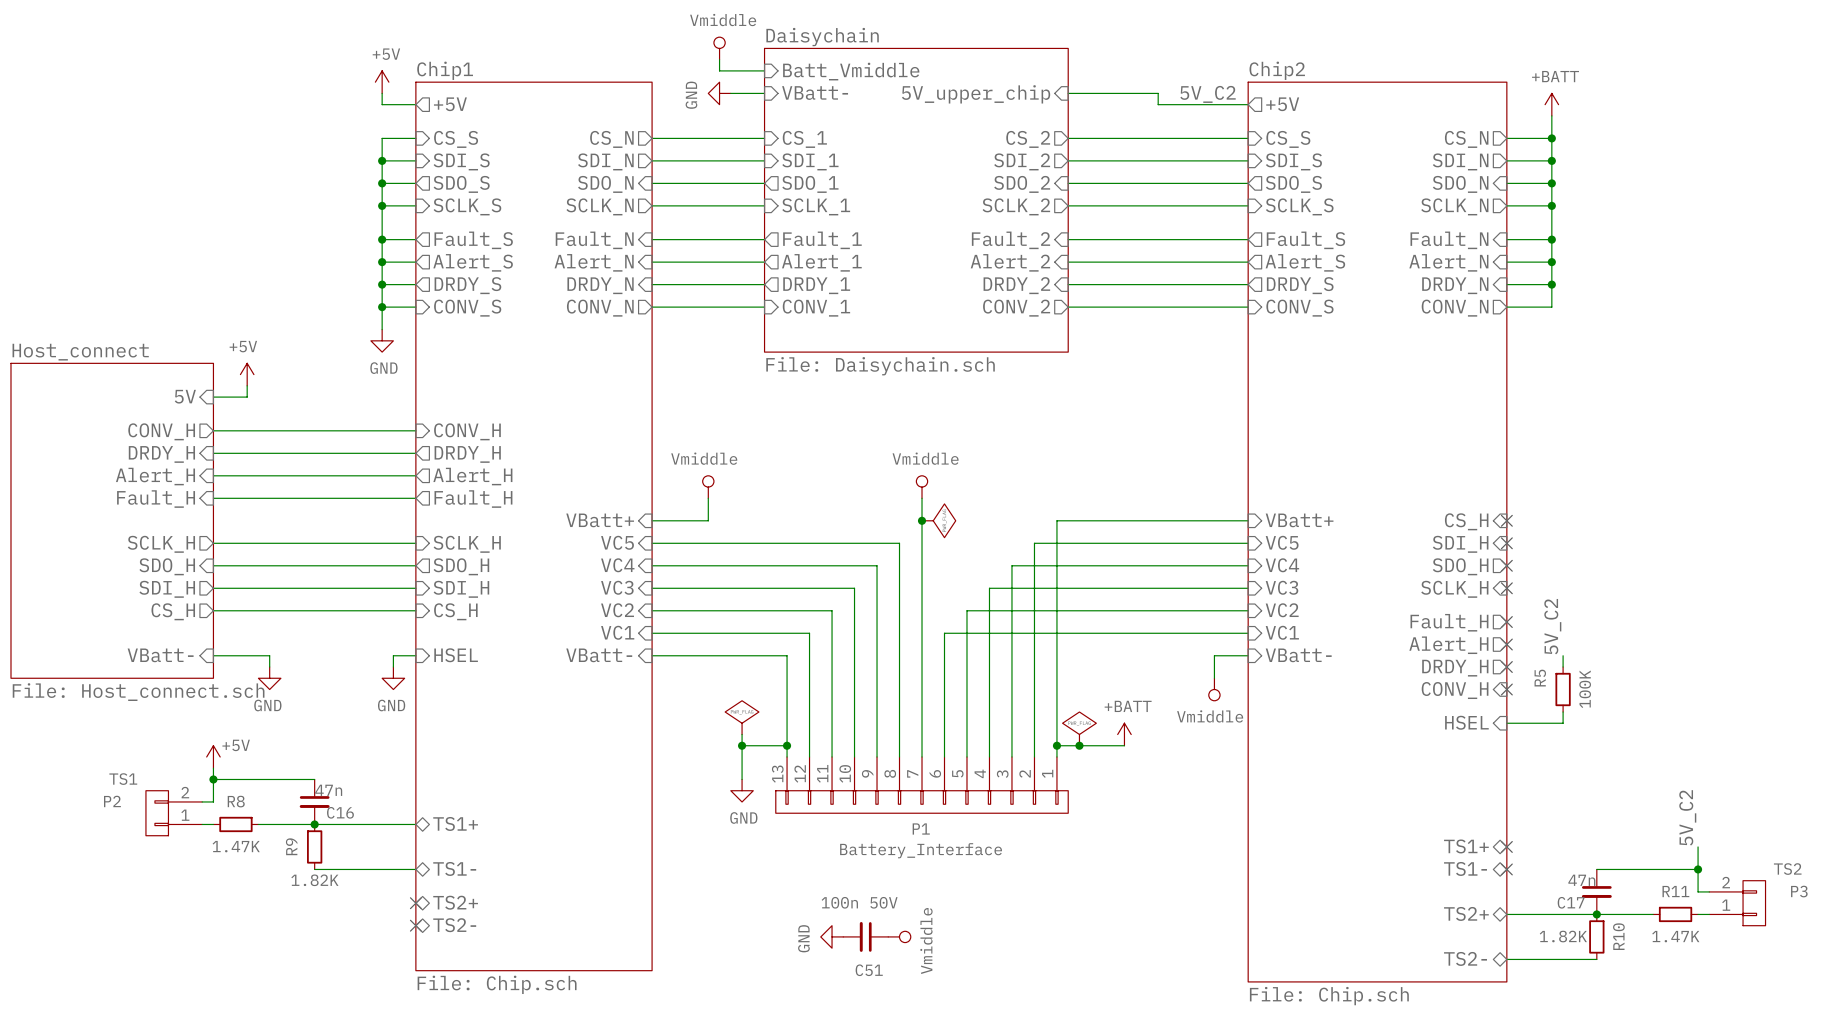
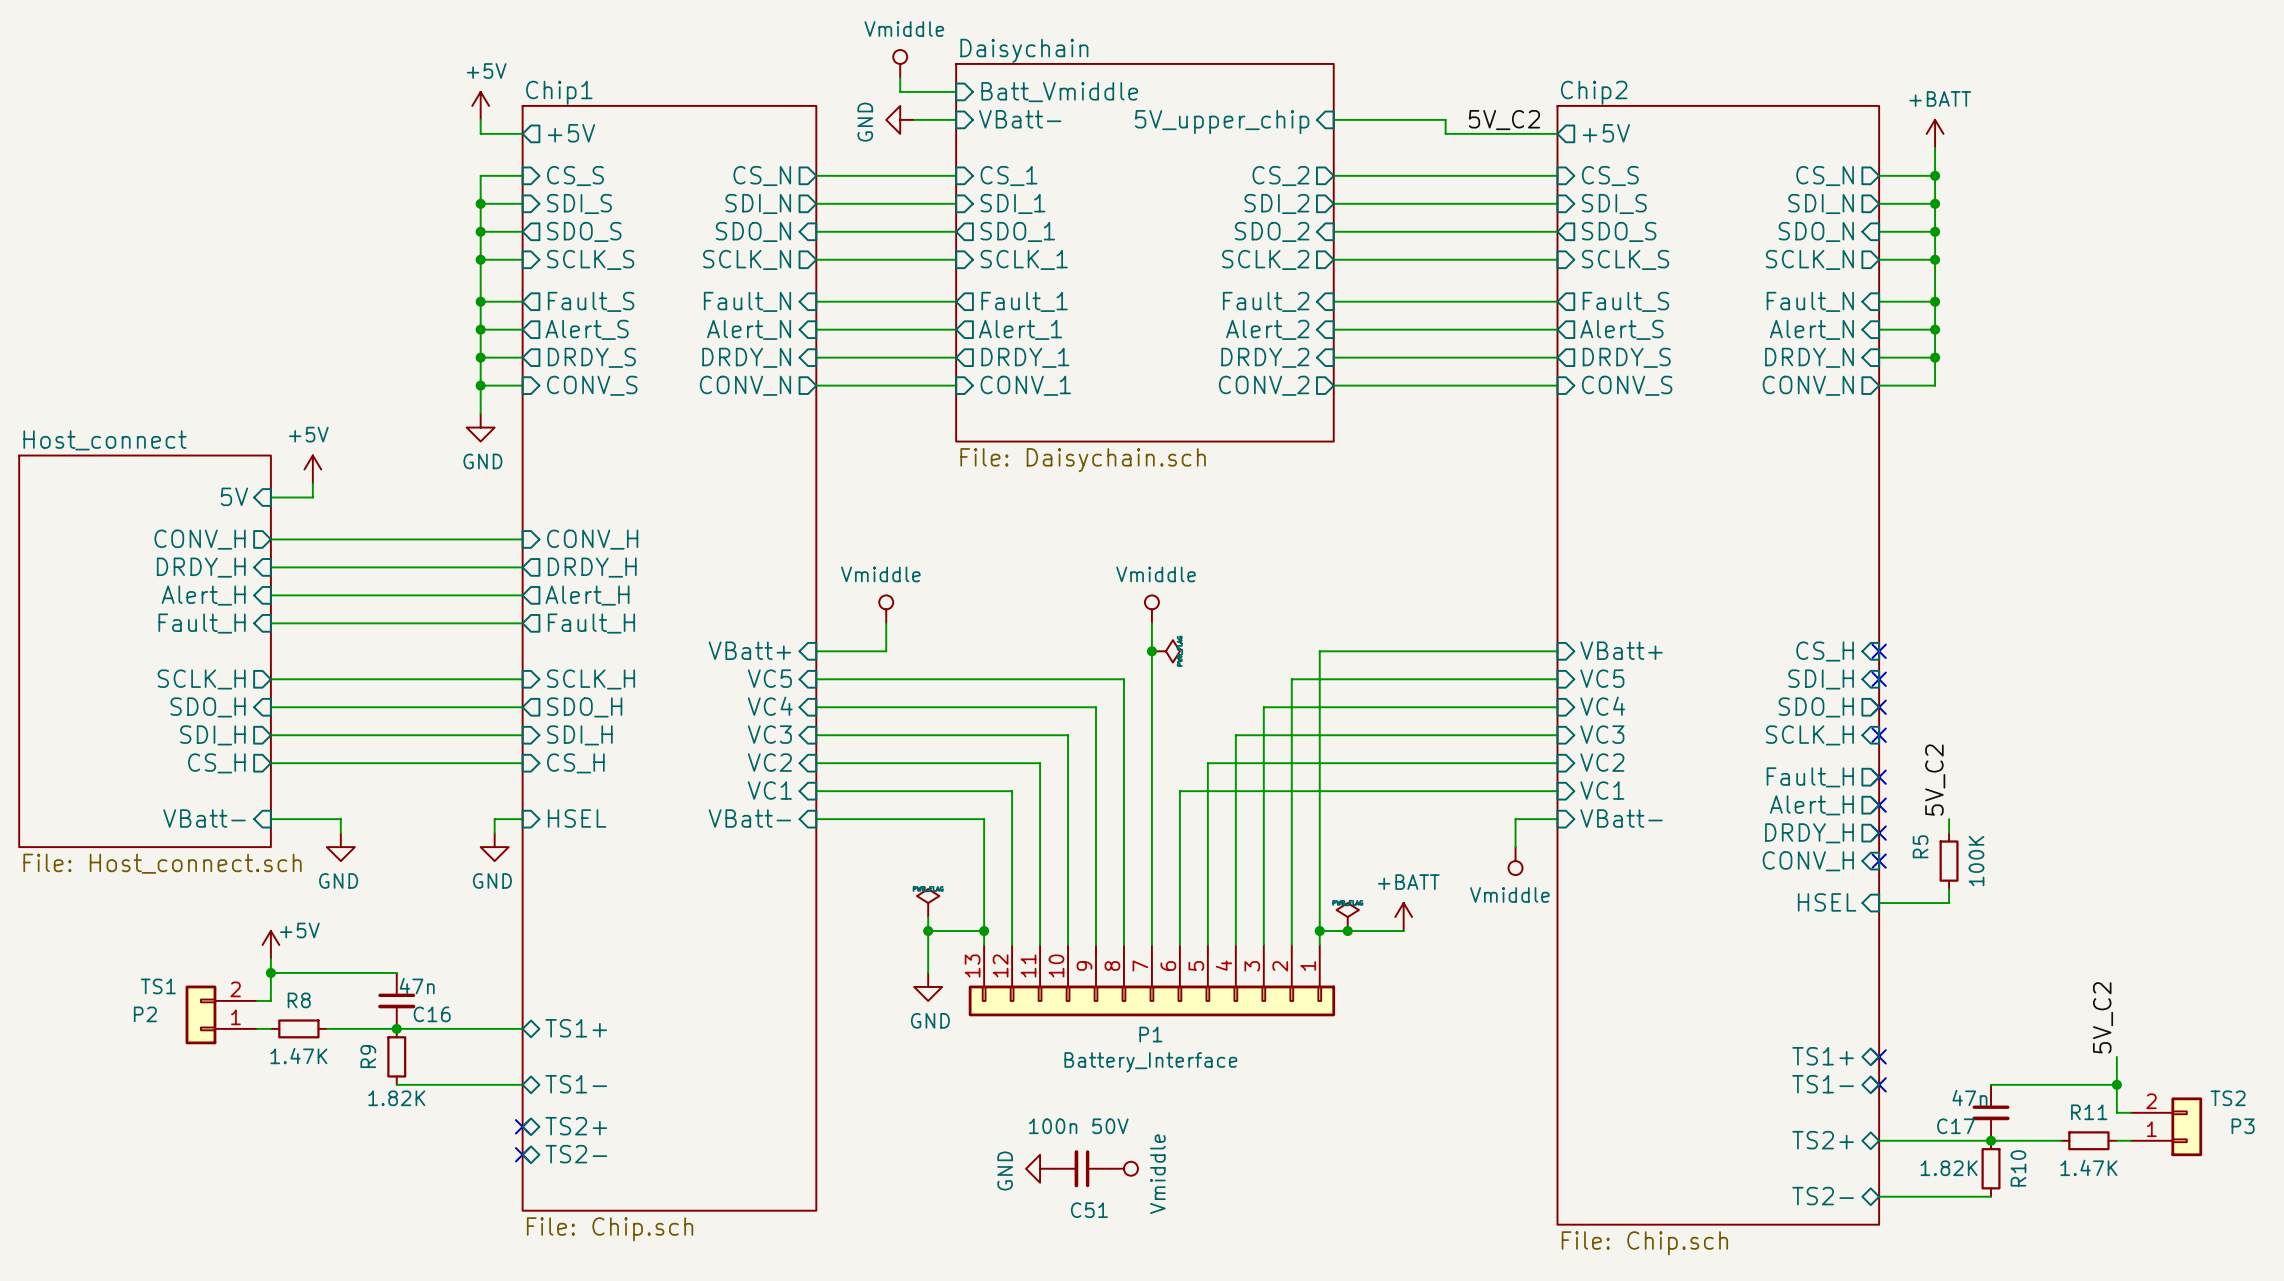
power symbol shape: [922, 503, 956, 538] -> [1151, 640, 1180, 663]
power symbol shape: [725, 700, 759, 735] -> [916, 889, 940, 918]
power symbol shape: [1062, 712, 1097, 746] -> [1336, 903, 1359, 932]
P1 symbol: [775, 756, 1069, 814] -> [968, 944, 1336, 1017]
P2 symbol: [145, 790, 203, 836] -> [185, 985, 257, 1045]
P3 symbol: [1709, 880, 1766, 926] -> [2130, 1097, 2203, 1157]

